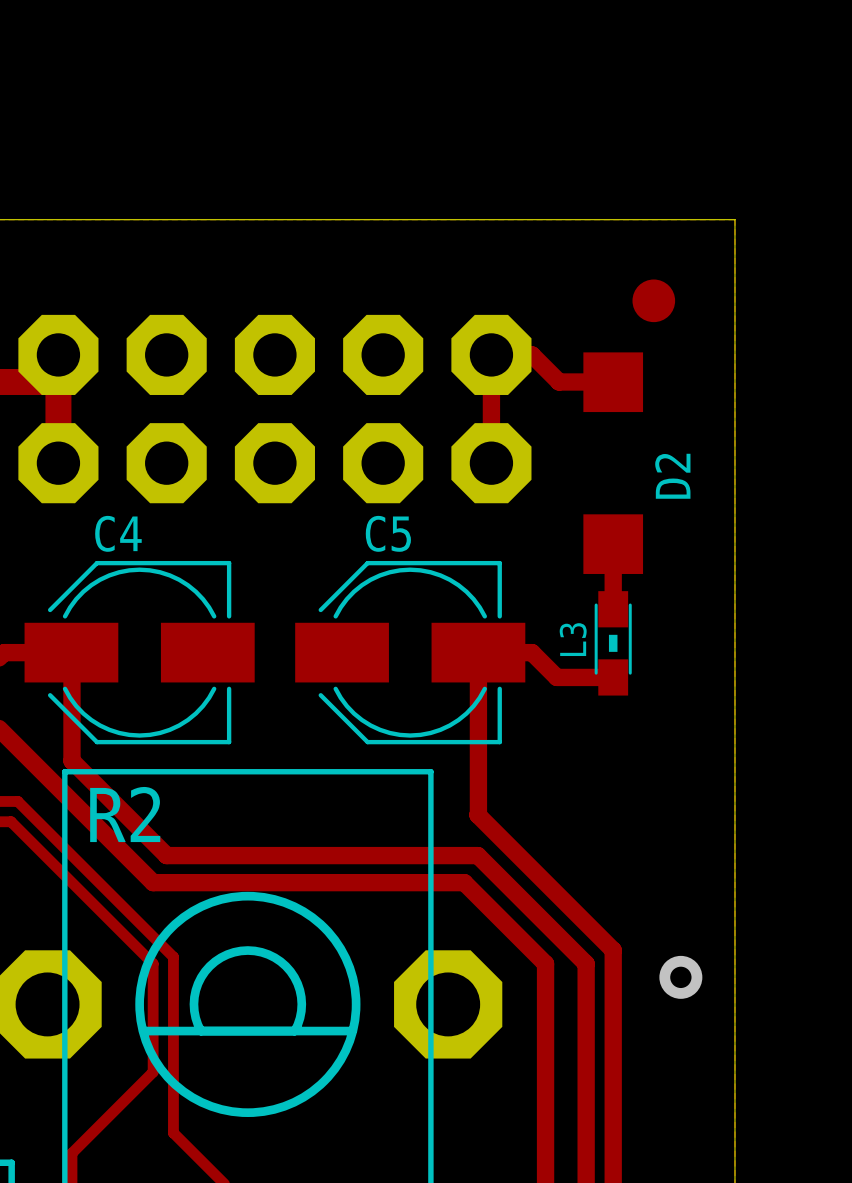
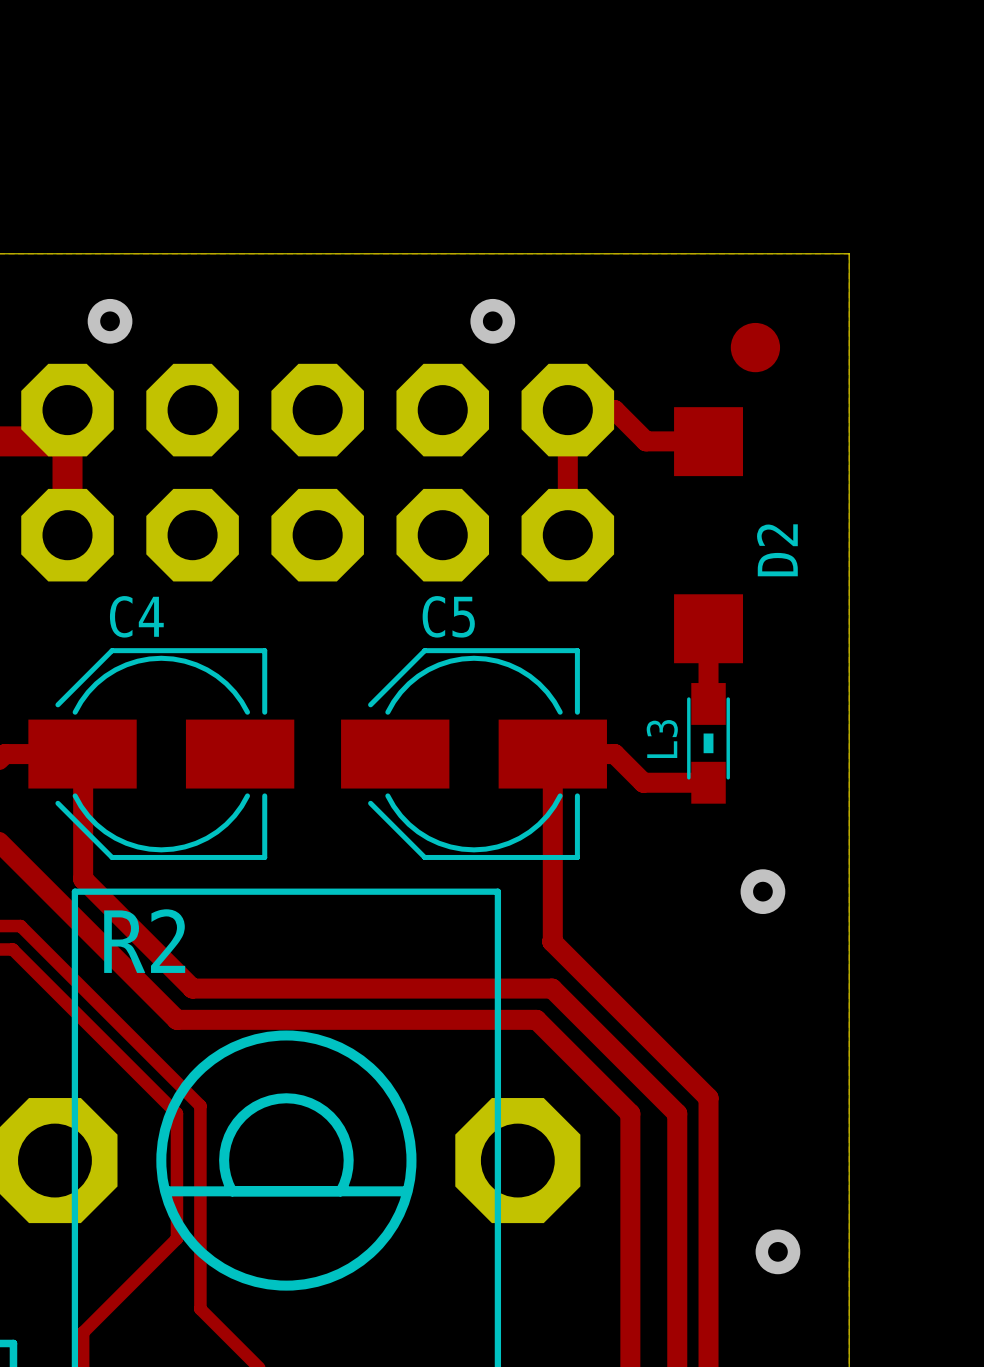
via: none -> (110, 321)
via: none -> (492, 321)
via: none -> (762, 891)
via: (680, 977) -> none
via: none -> (777, 1251)

